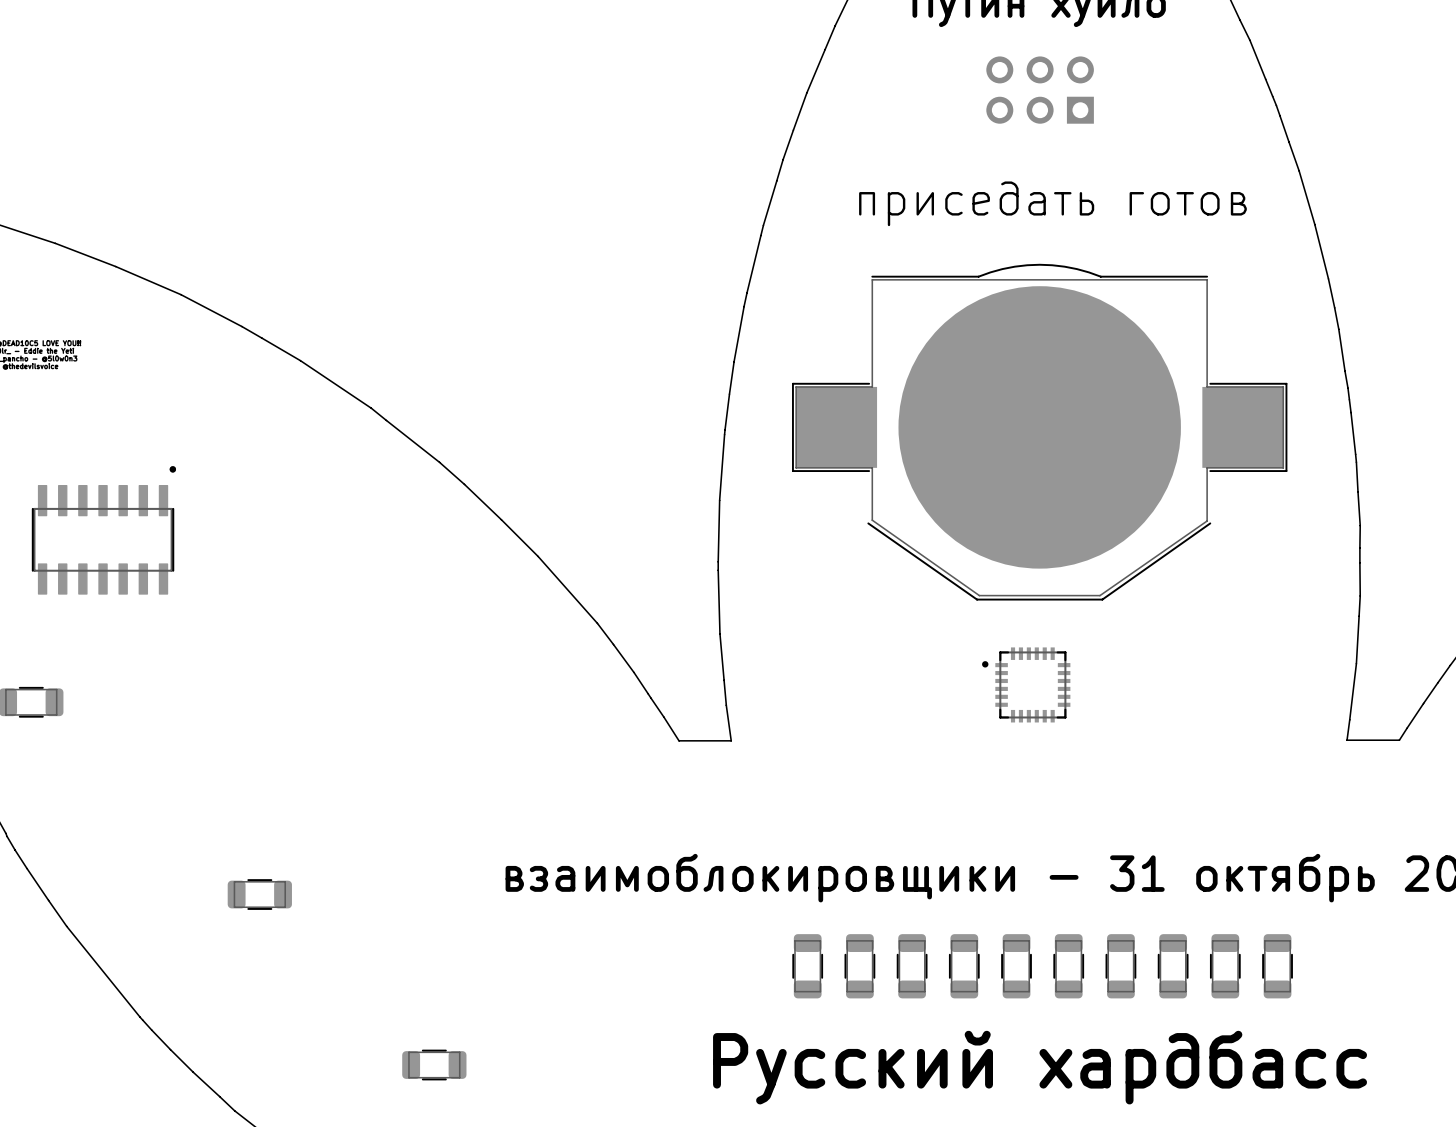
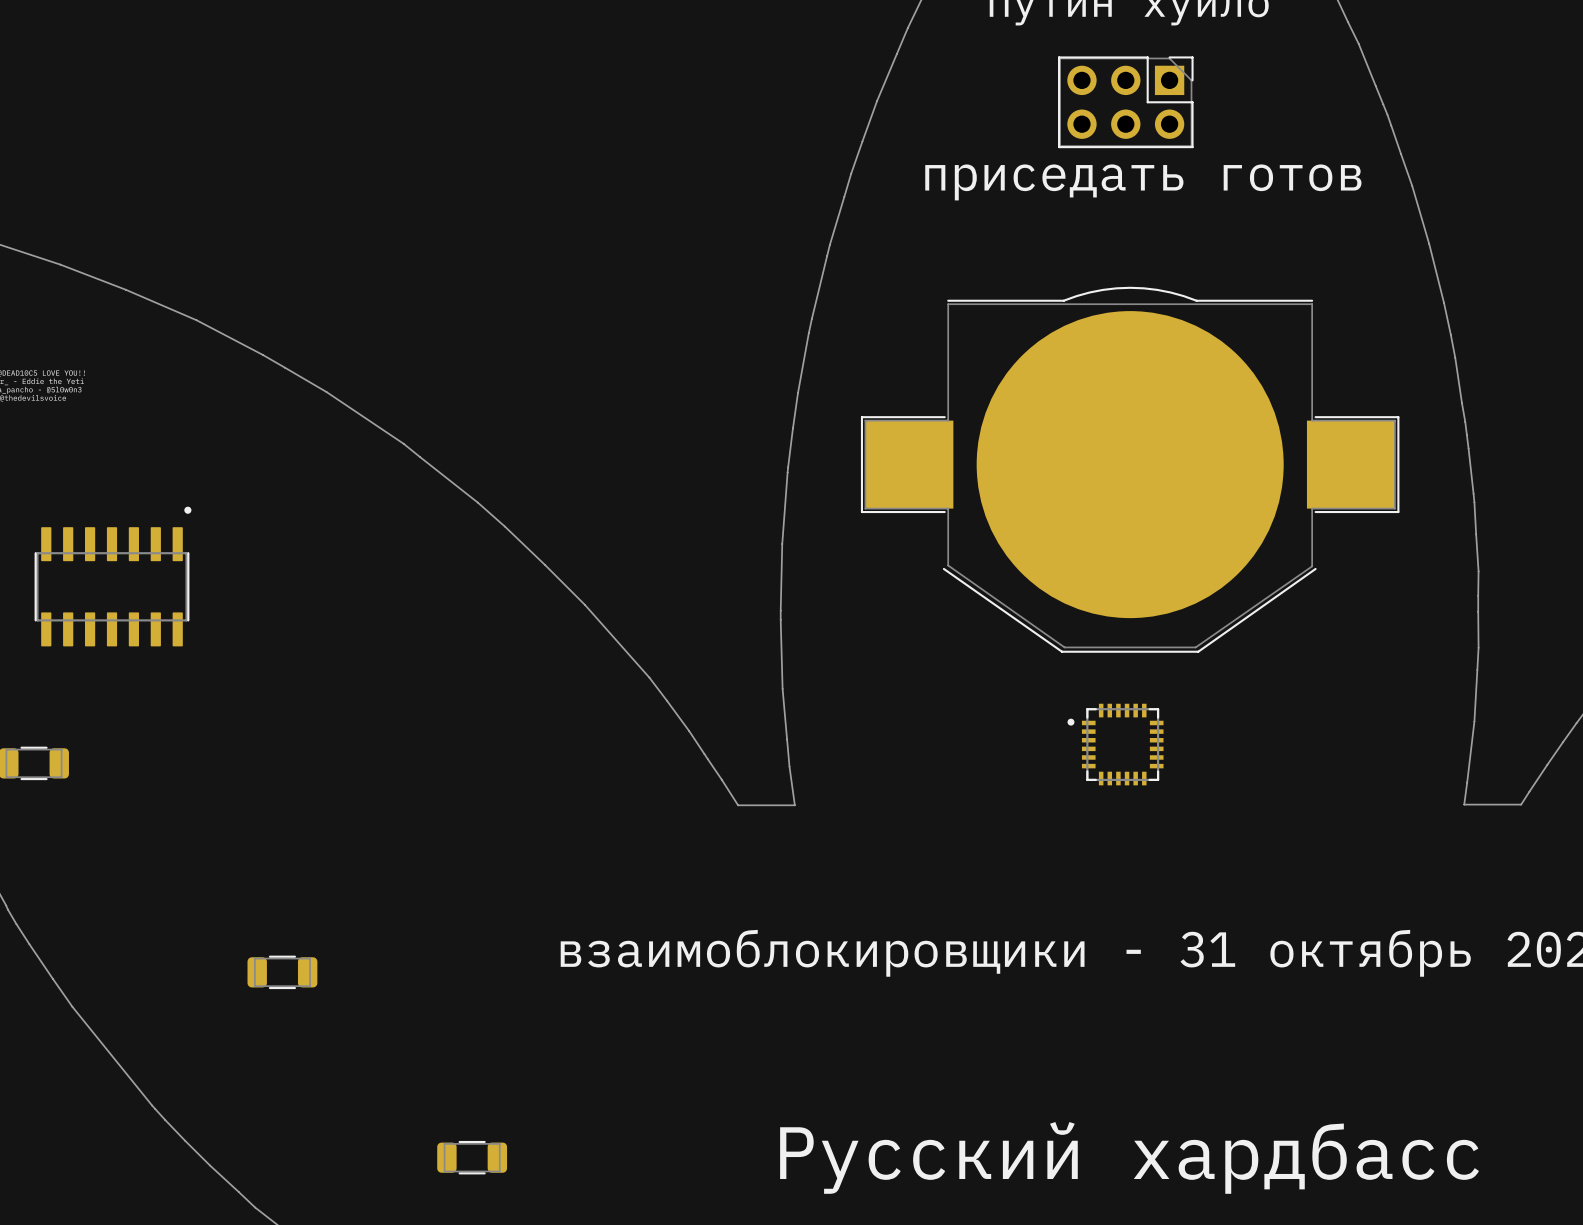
part side: top (1040, 90) -> bottom (1125, 102)
text position: приседать готов (1052, 203) -> приседать готов (1143, 182)
part: (807, 966) -> none
part: (859, 966) -> none
part: (912, 966) -> none
part: (964, 966) -> none
part: (1016, 966) -> none
part: (1068, 966) -> none
part: (1120, 966) -> none
part: (1173, 966) -> none
part: (1225, 966) -> none
part: (1277, 966) -> none

